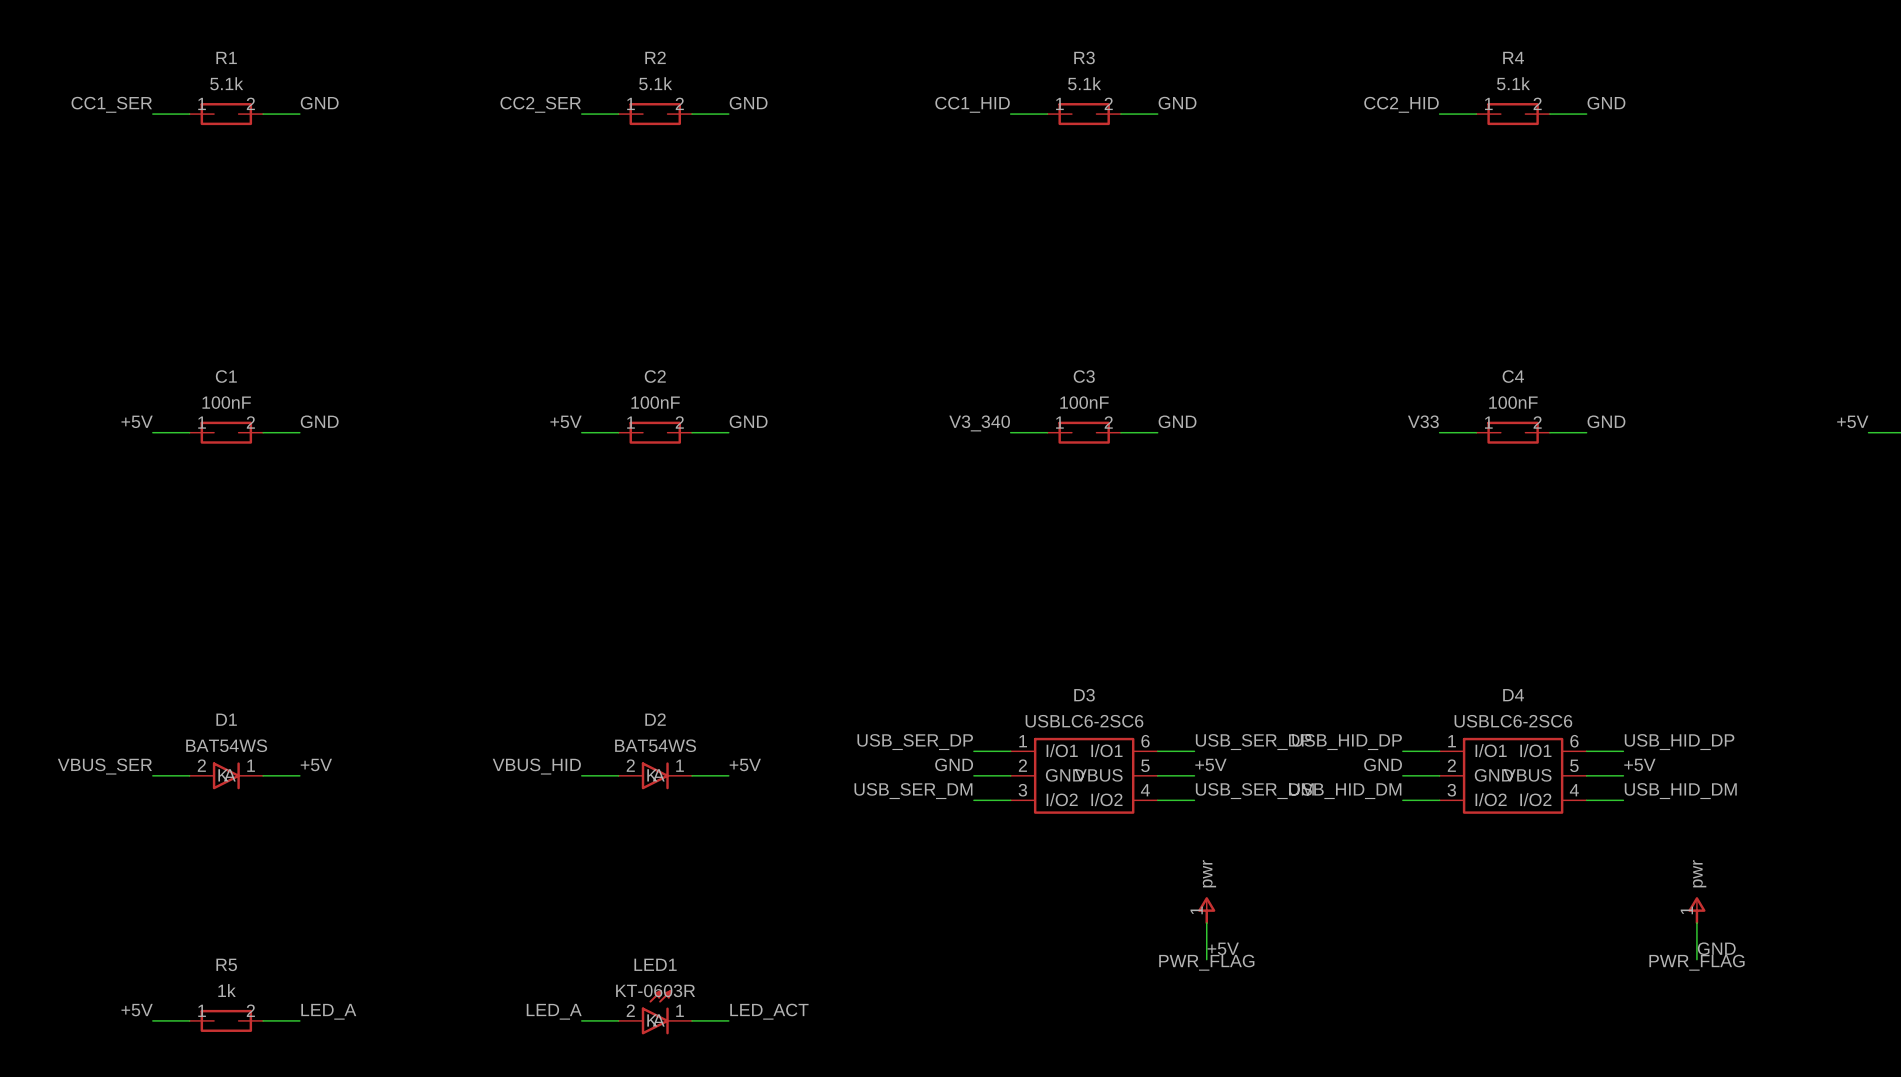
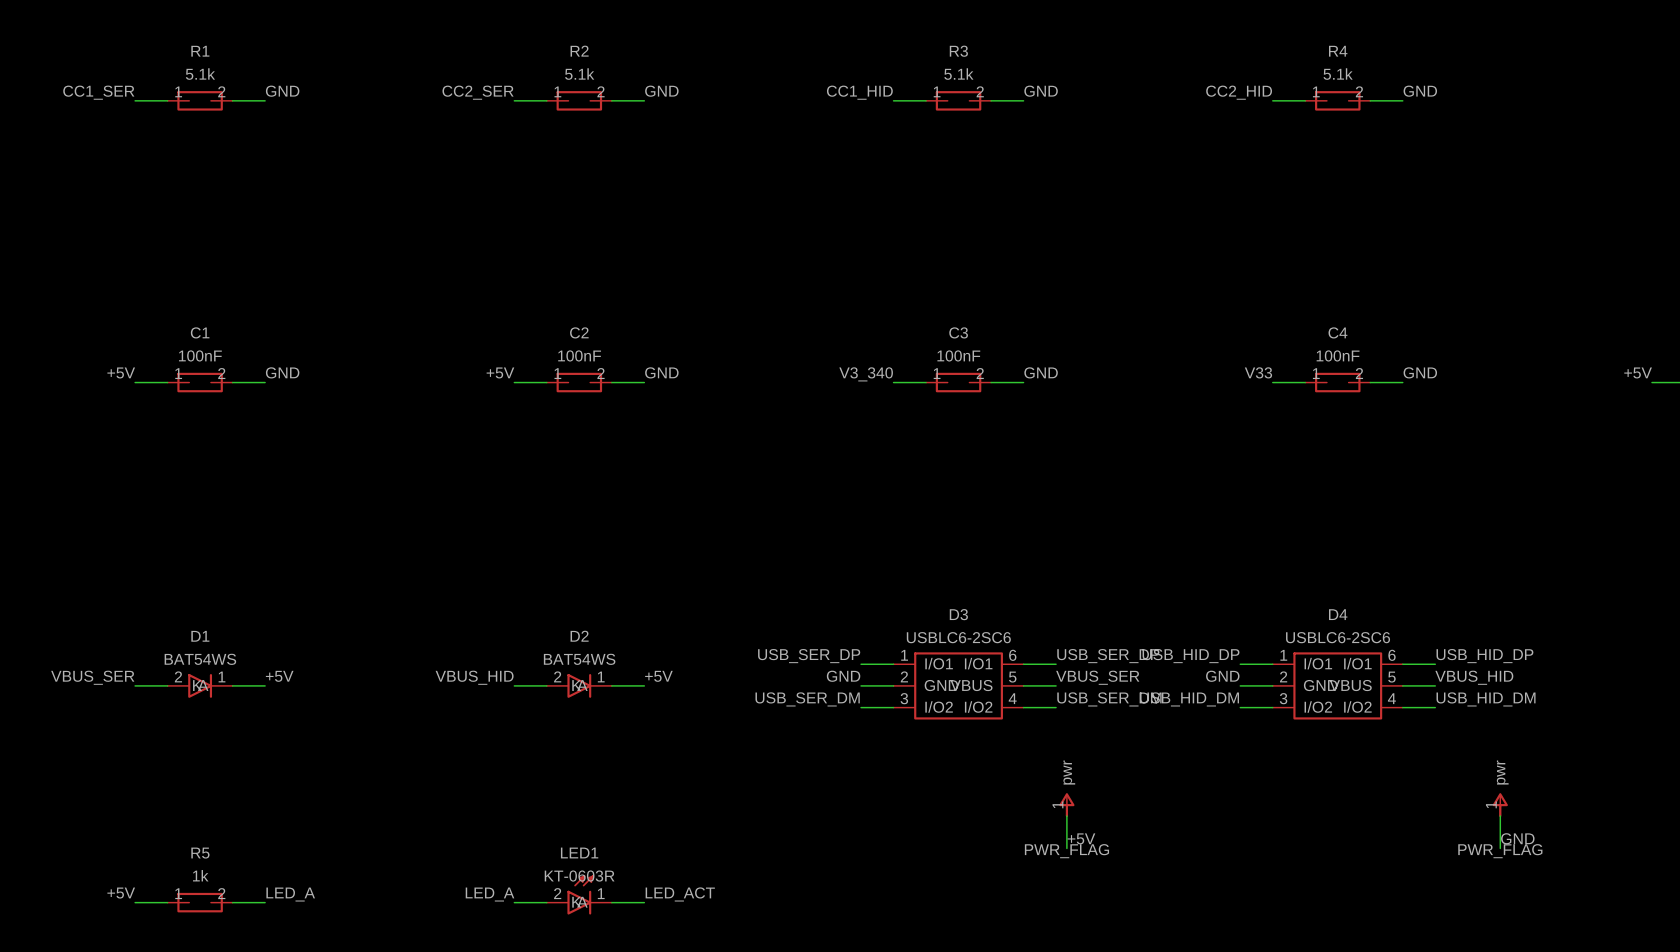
label: +5V (1210, 764) -> VBUS_SER (1097, 677)
label: +5V (1639, 764) -> VBUS_HID (1474, 677)

